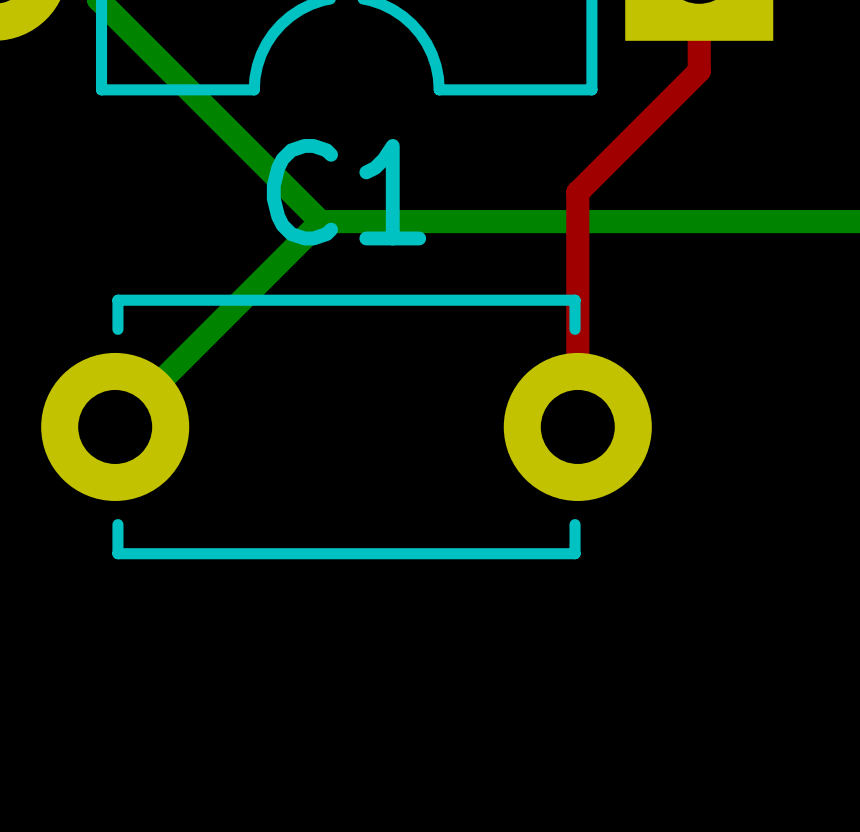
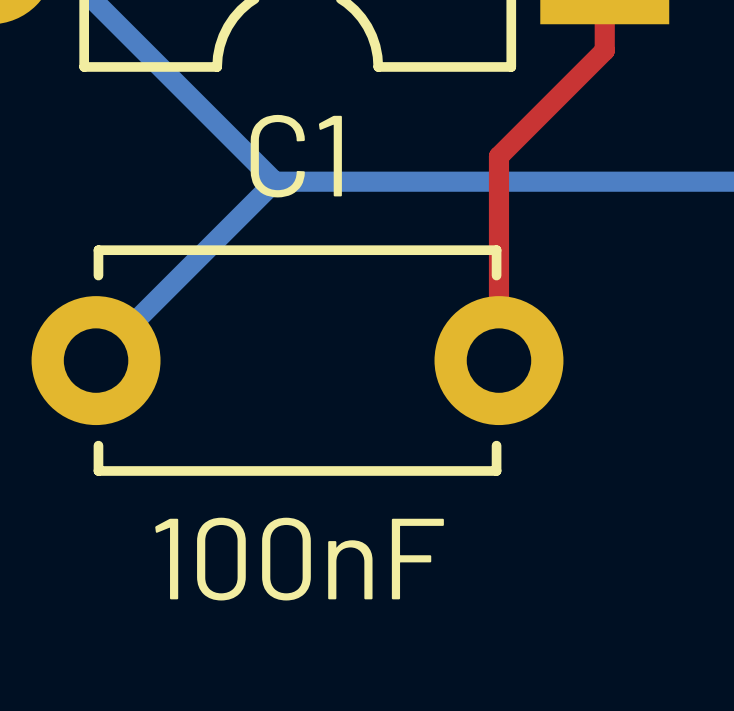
C1 value: none -> 100nF (299, 559)

